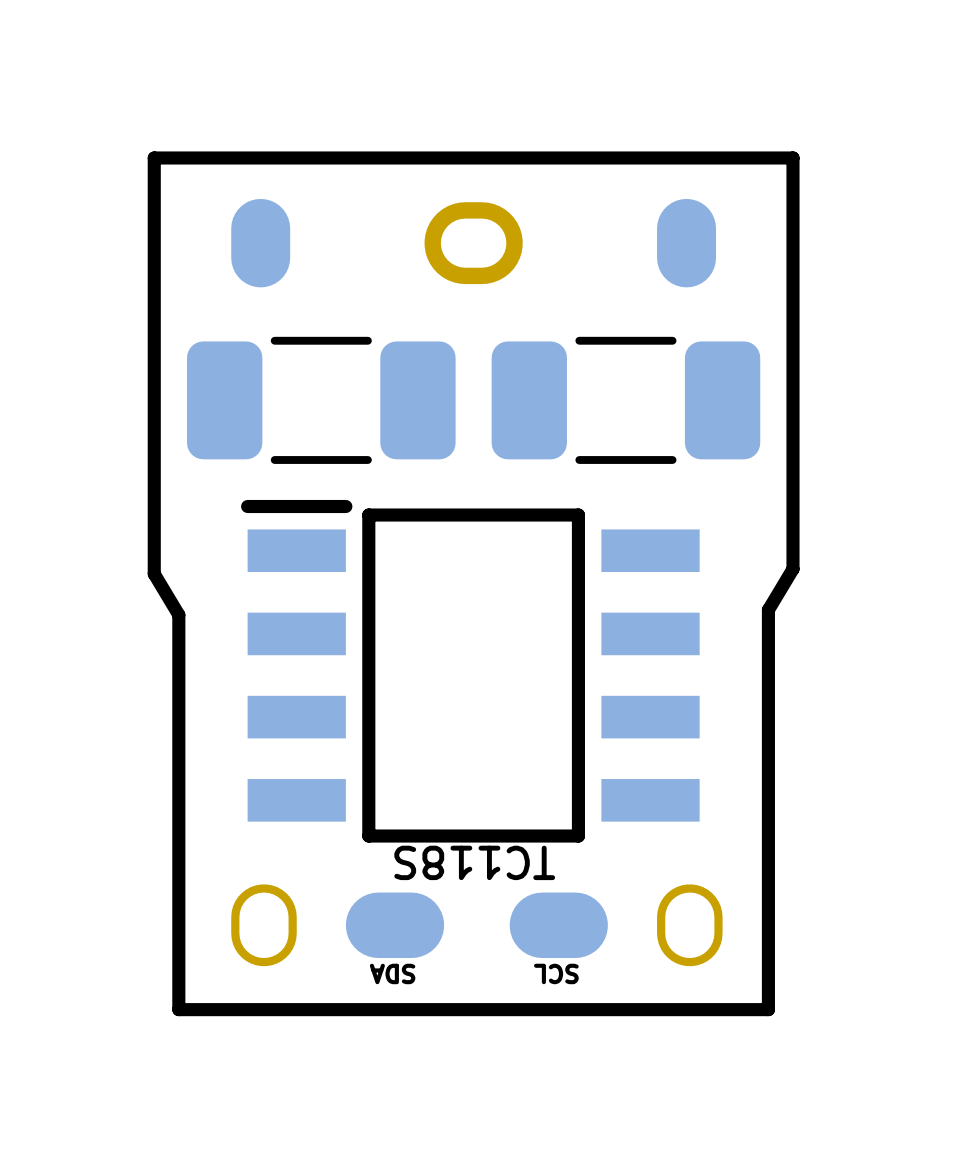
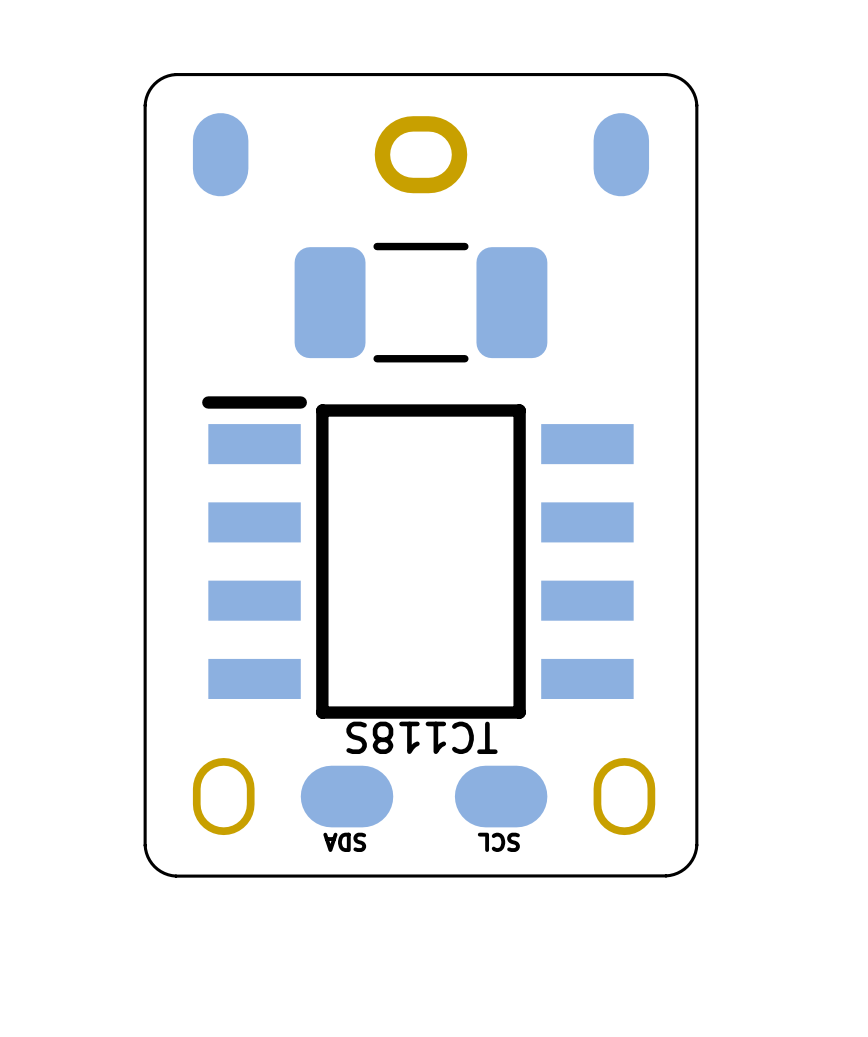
board edge: (734, 157) (792, 157) (792, 569) (768, 610) (768, 1009) (178, 1009) (178, 614) (154, 573) (154, 157) (213, 157) -> (666, 74) (677, 77) (687, 84) (694, 93) (696, 105) (696, 845) (692, 860) (681, 871) (666, 875) (175, 876) (164, 873) (154, 866) (147, 856) (145, 845) (145, 105) (147, 93) (154, 84) (164, 77) (175, 74)
board edge width: thick (734, 157) (213, 157) -> thin (666, 74) (175, 74)
part: (321, 400) -> none
part: none -> (420, 302)
part: (625, 400) -> none

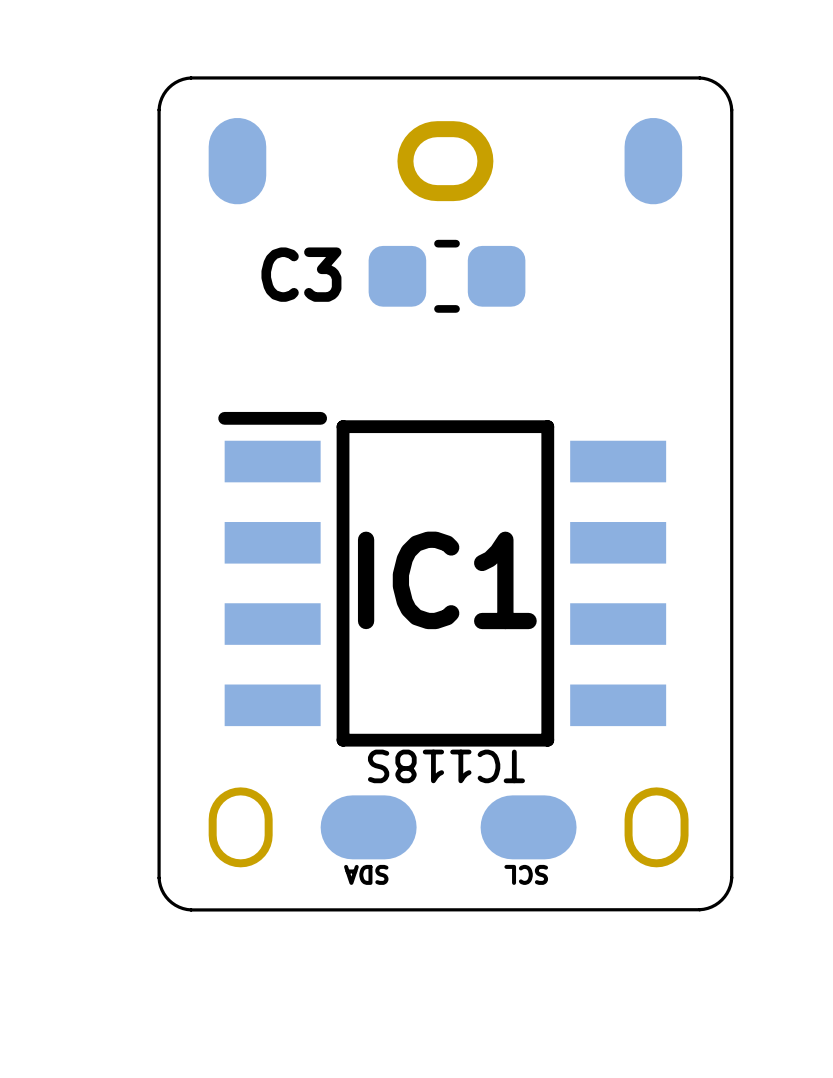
C3: none -> (447, 276)
part: (420, 302) -> none
IC1 name: none -> IC1 (447, 580)

